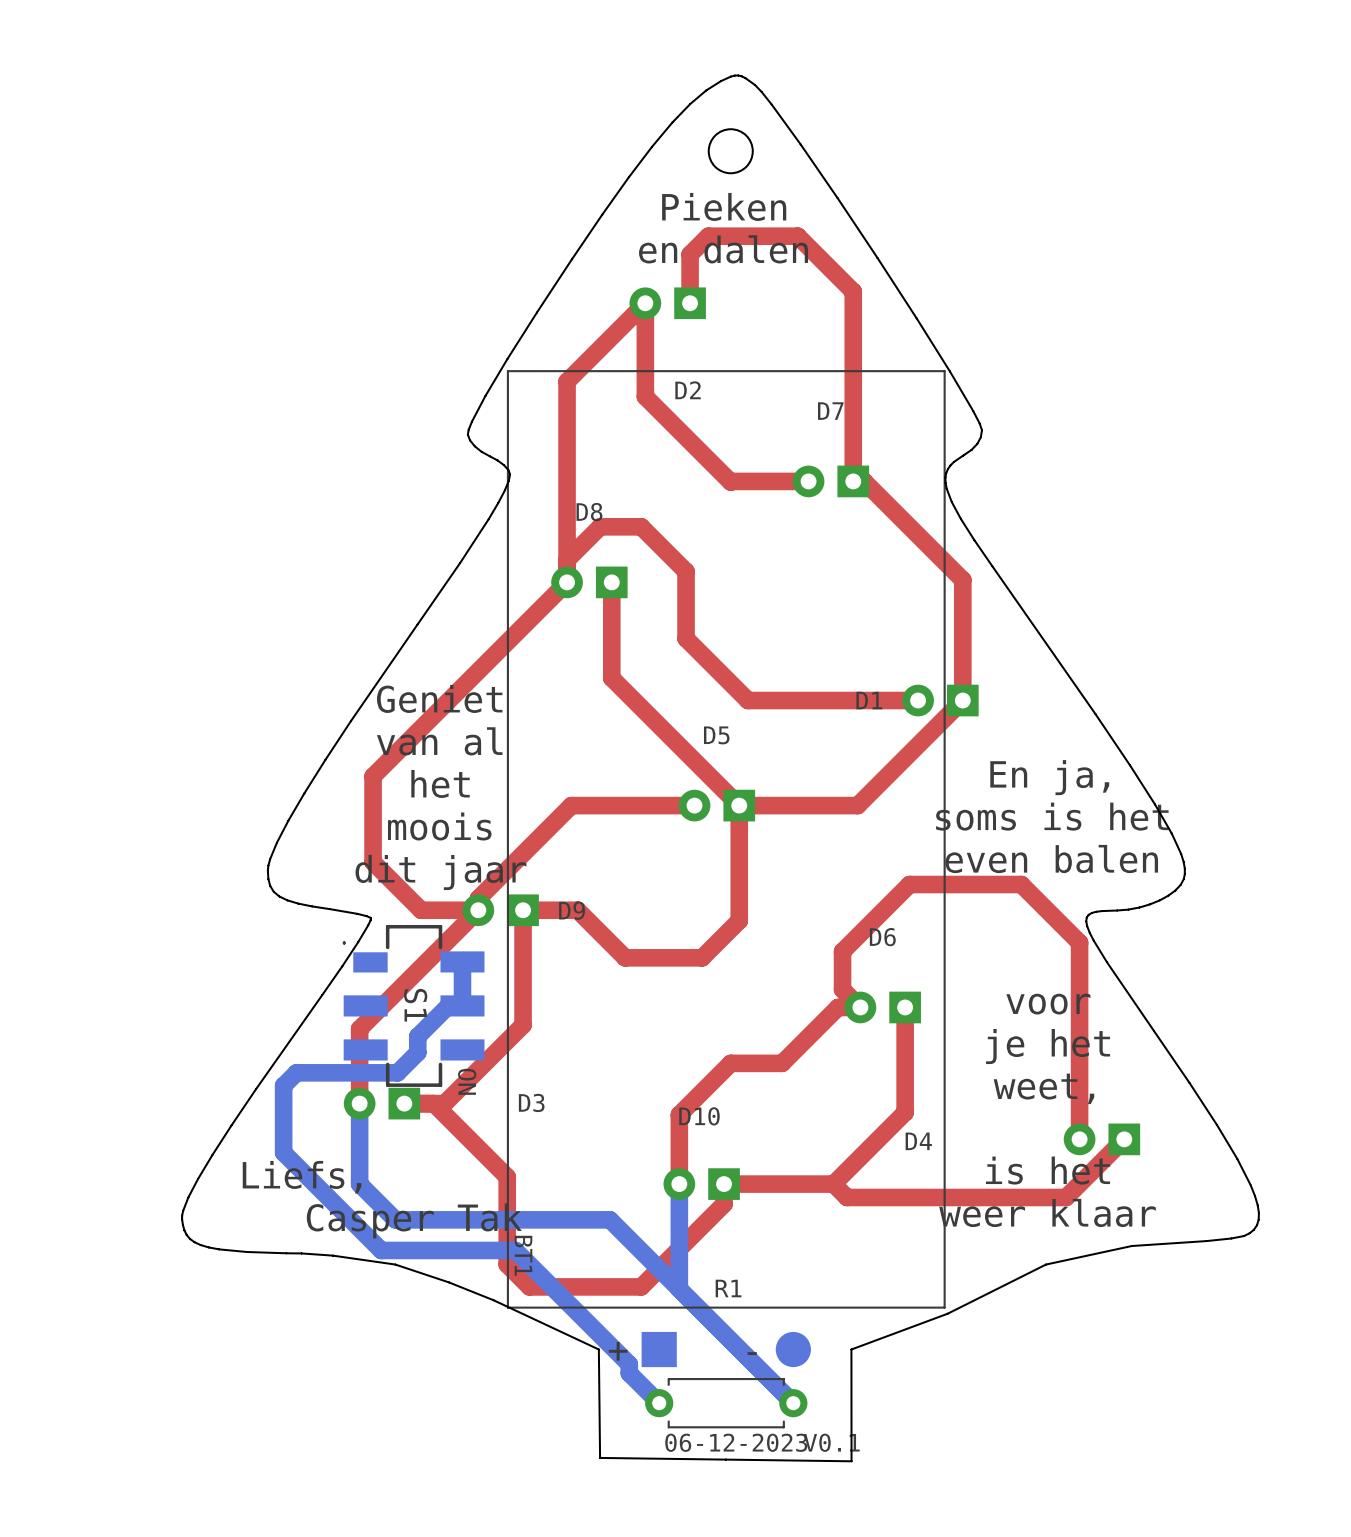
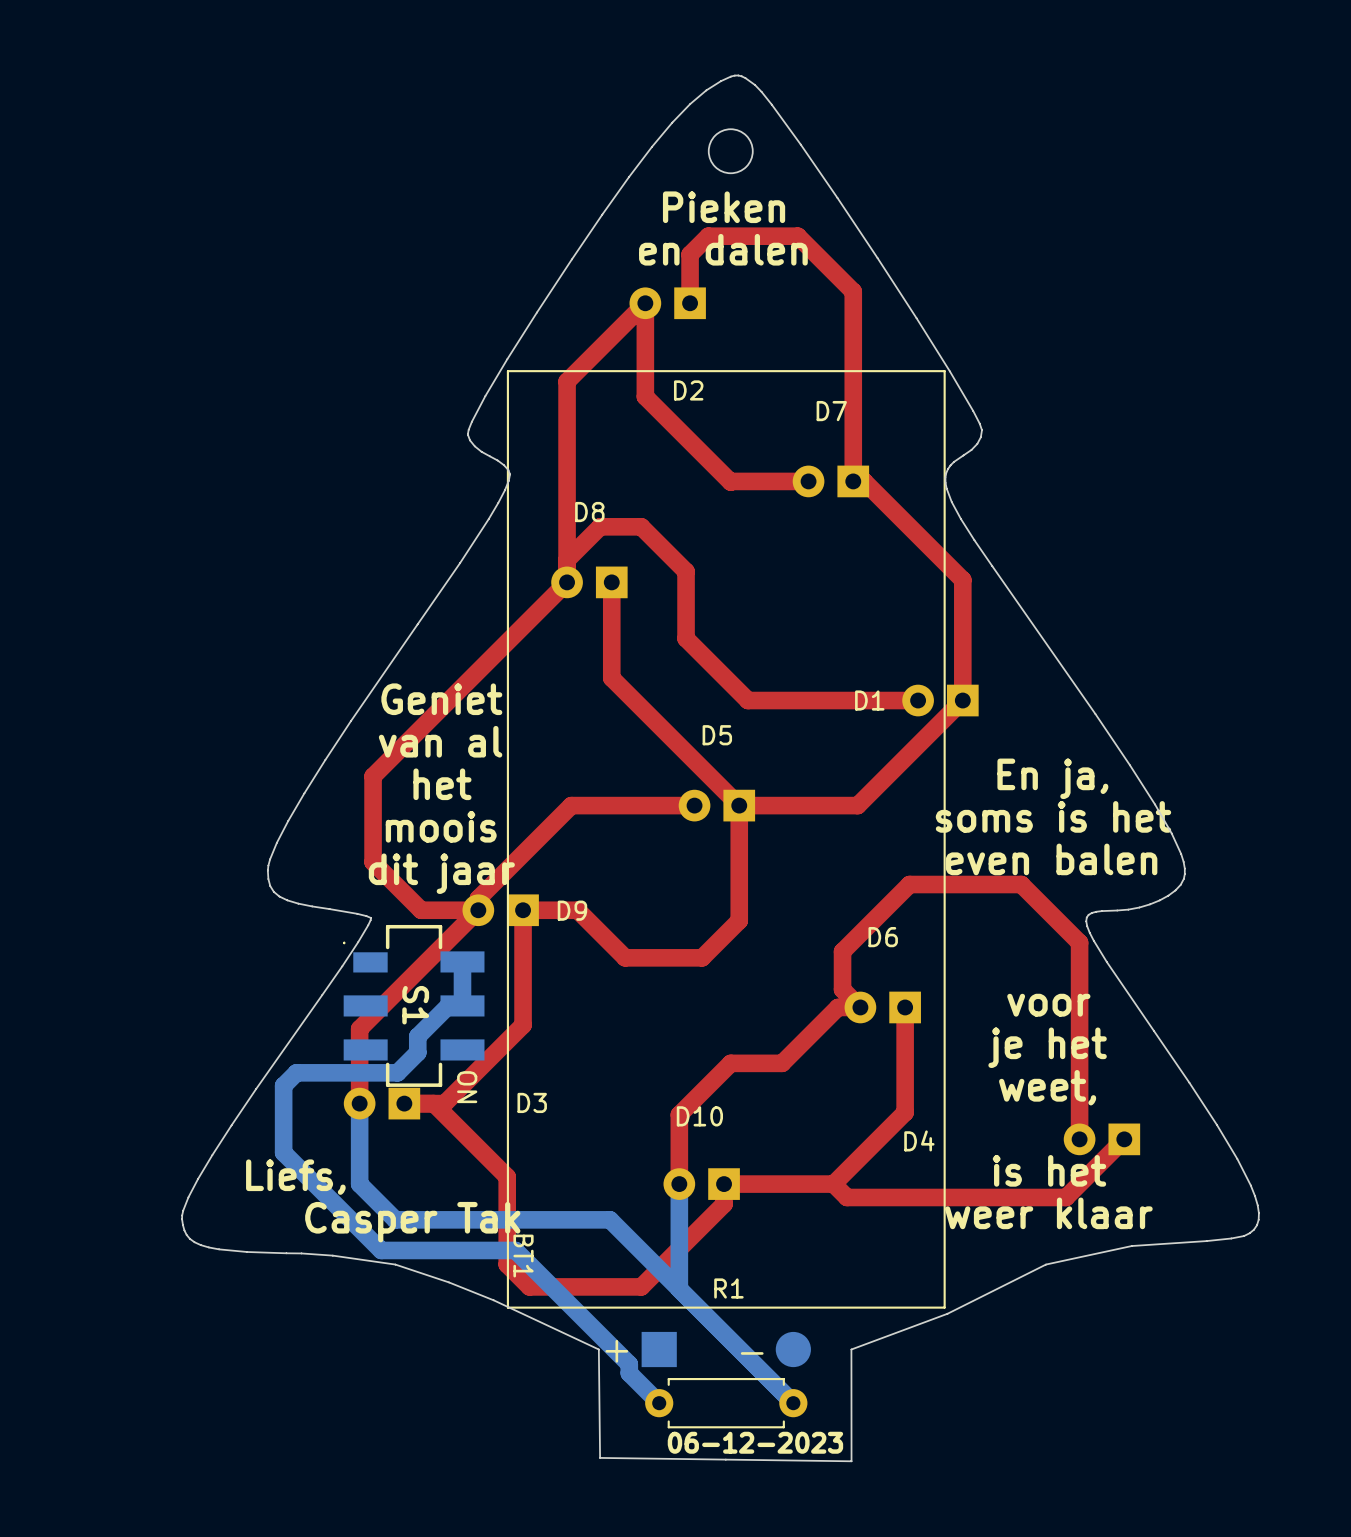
text: V0.1 (831, 1442) -> none

